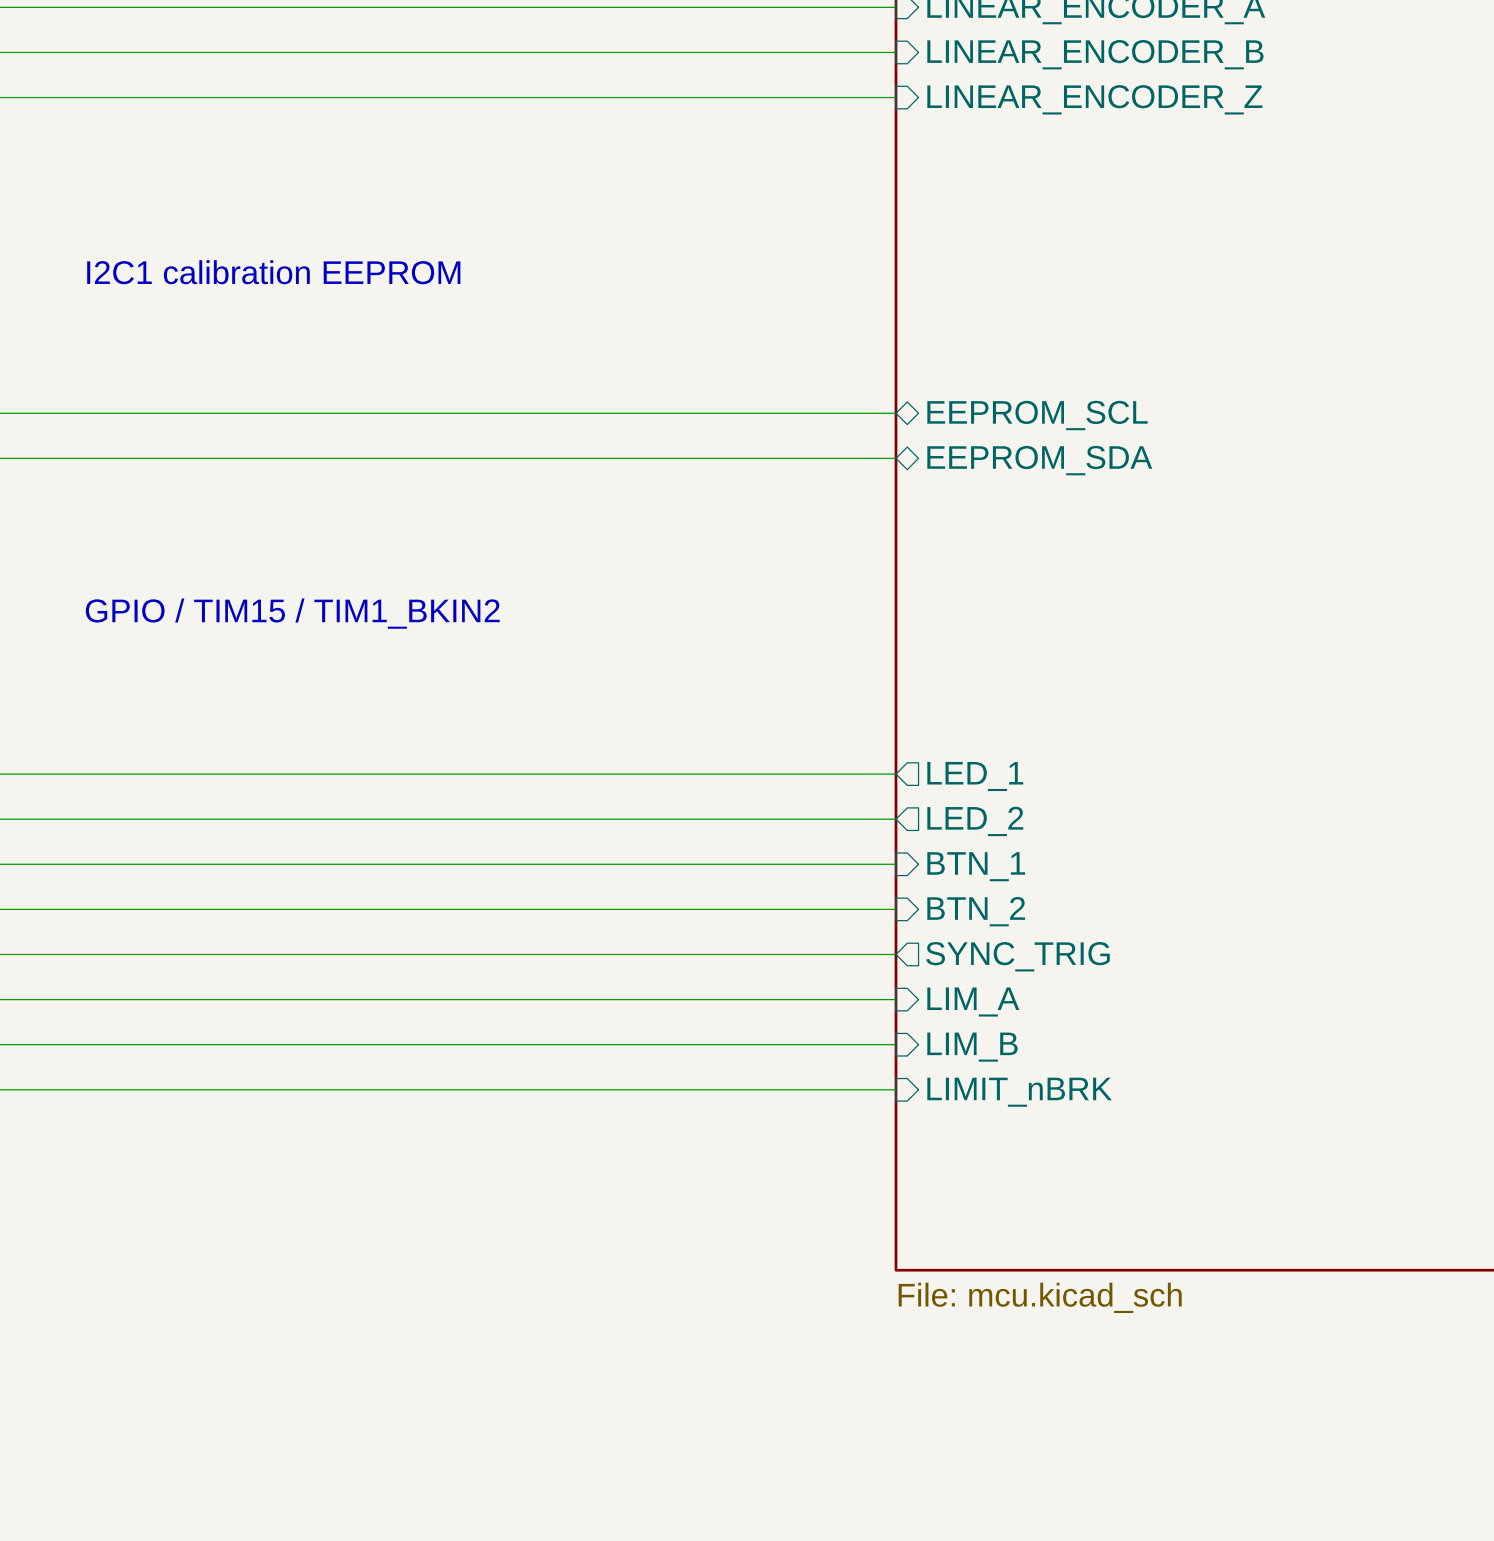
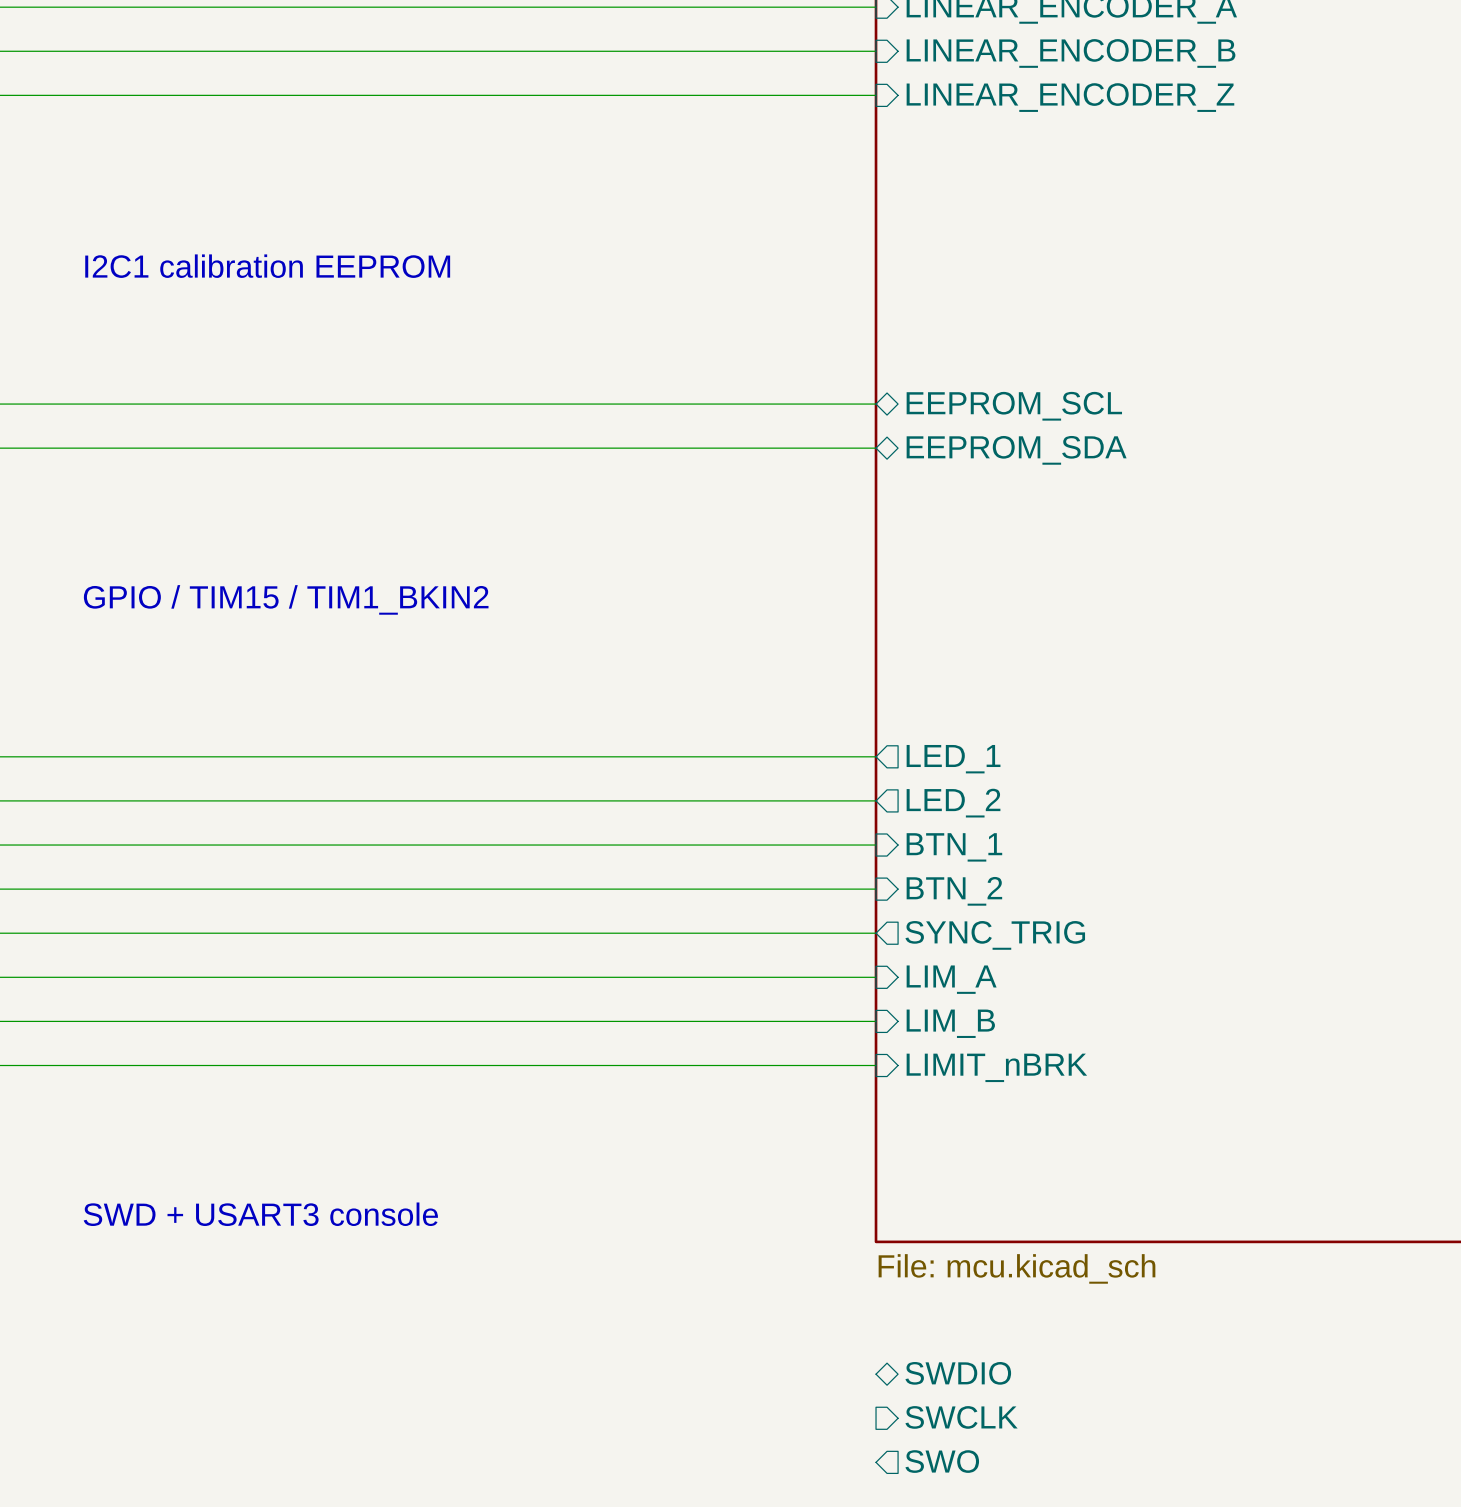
text: none -> SWD + USART3 console (260, 1214)
sheet pin: none -> SWDIO (958, 1373)
sheet pin: none -> SWCLK (961, 1417)
sheet pin: none -> SWO (942, 1461)

